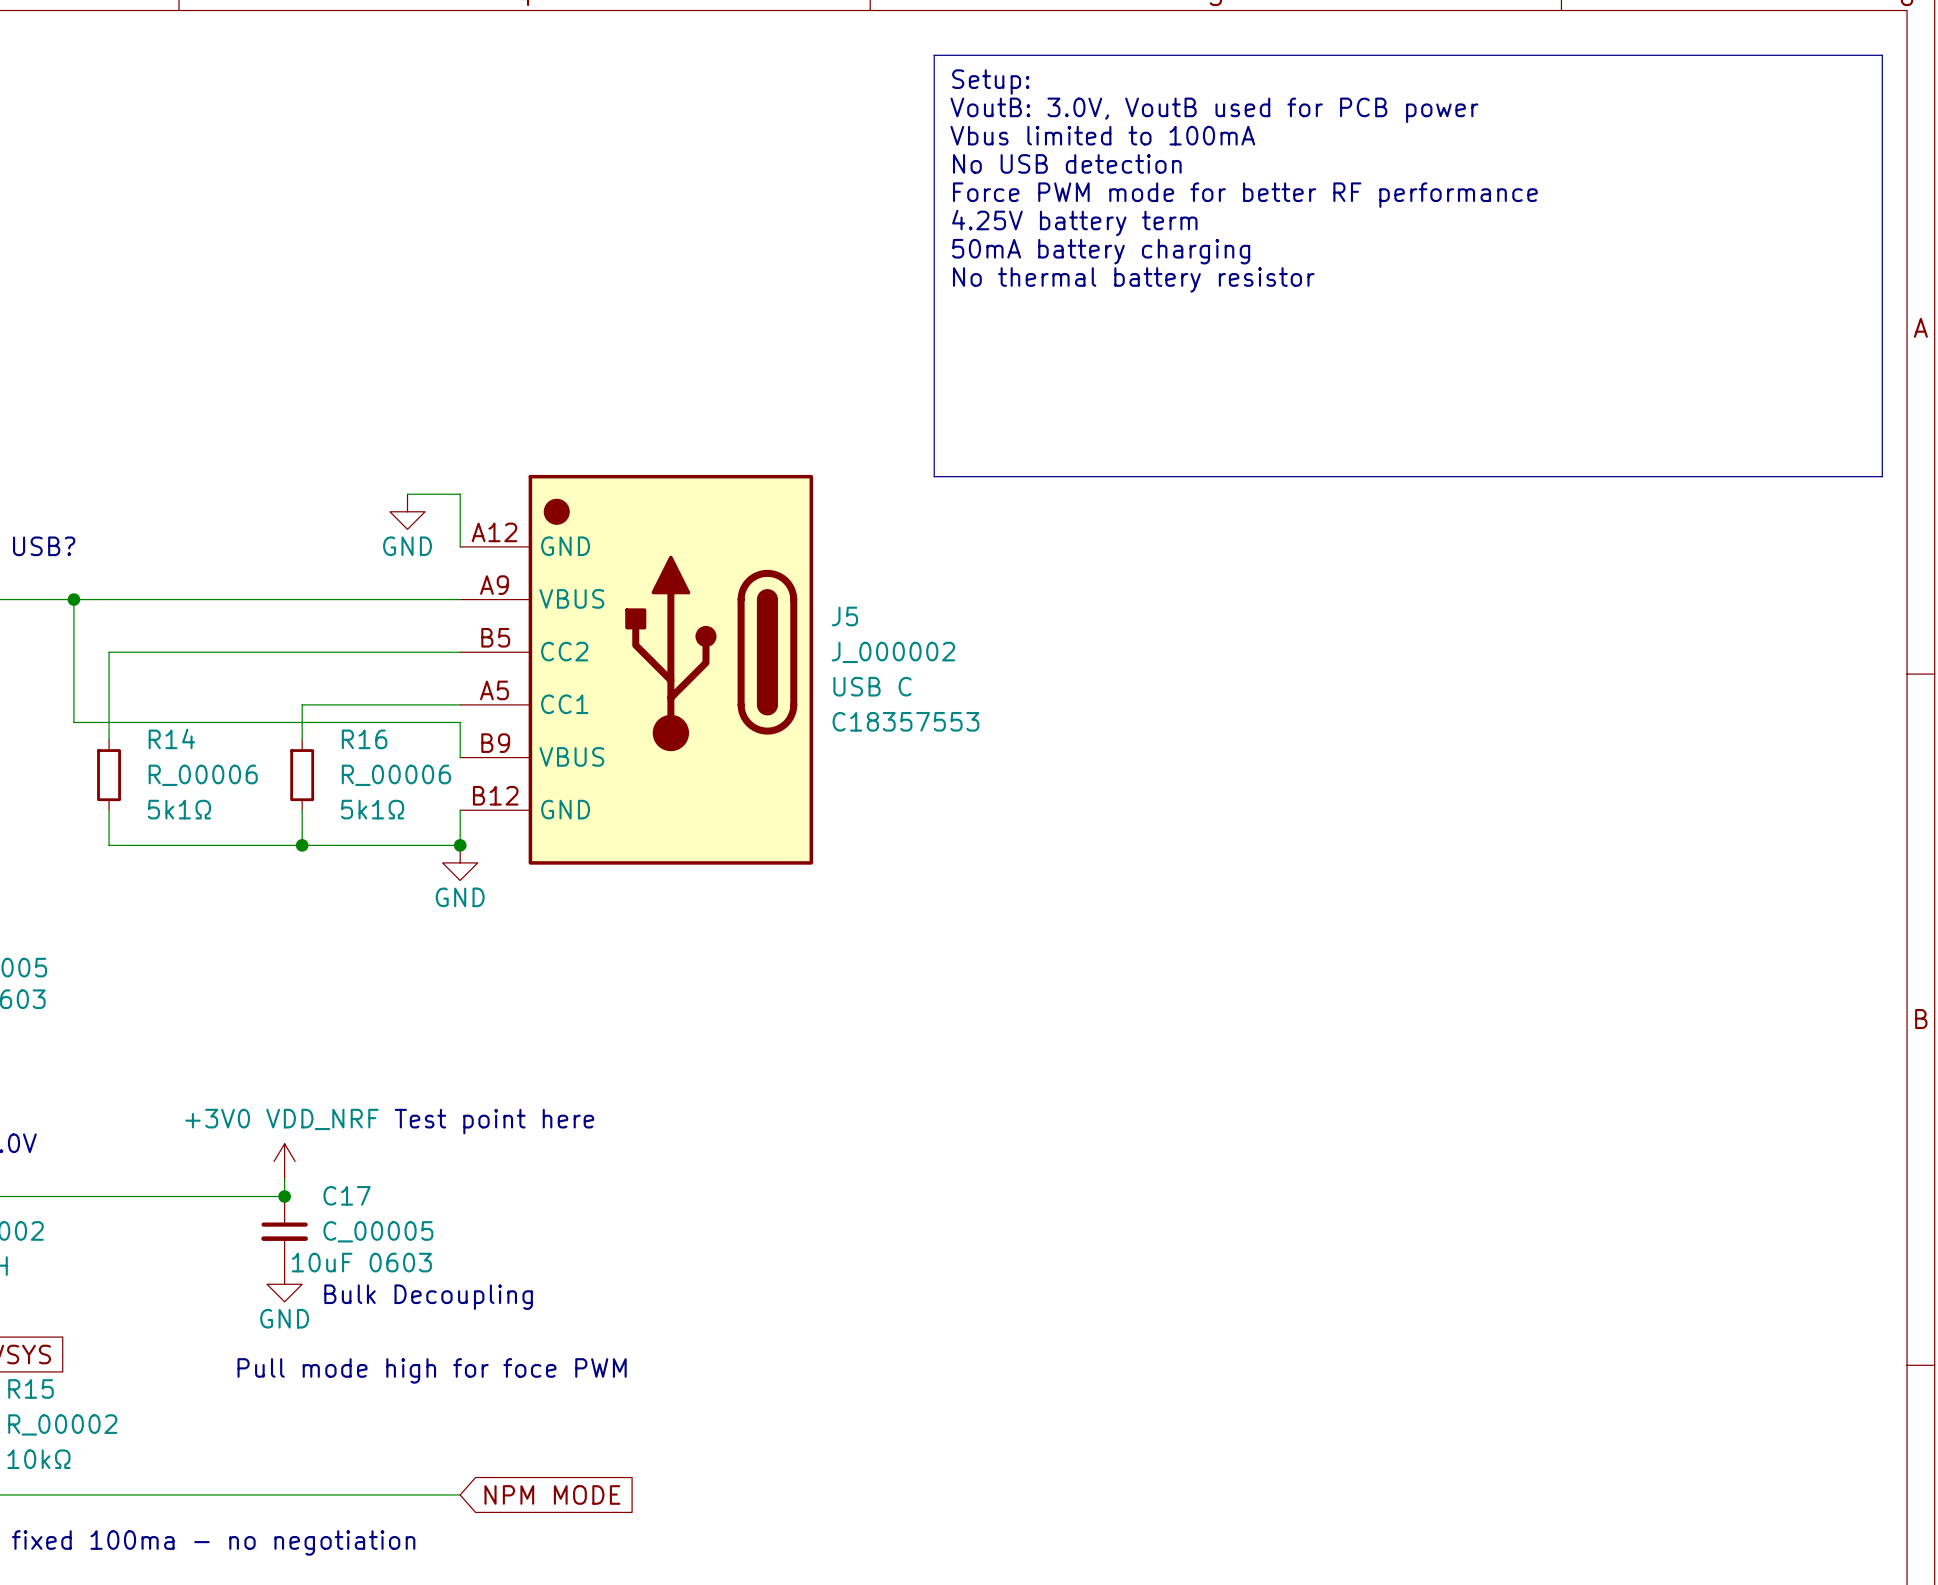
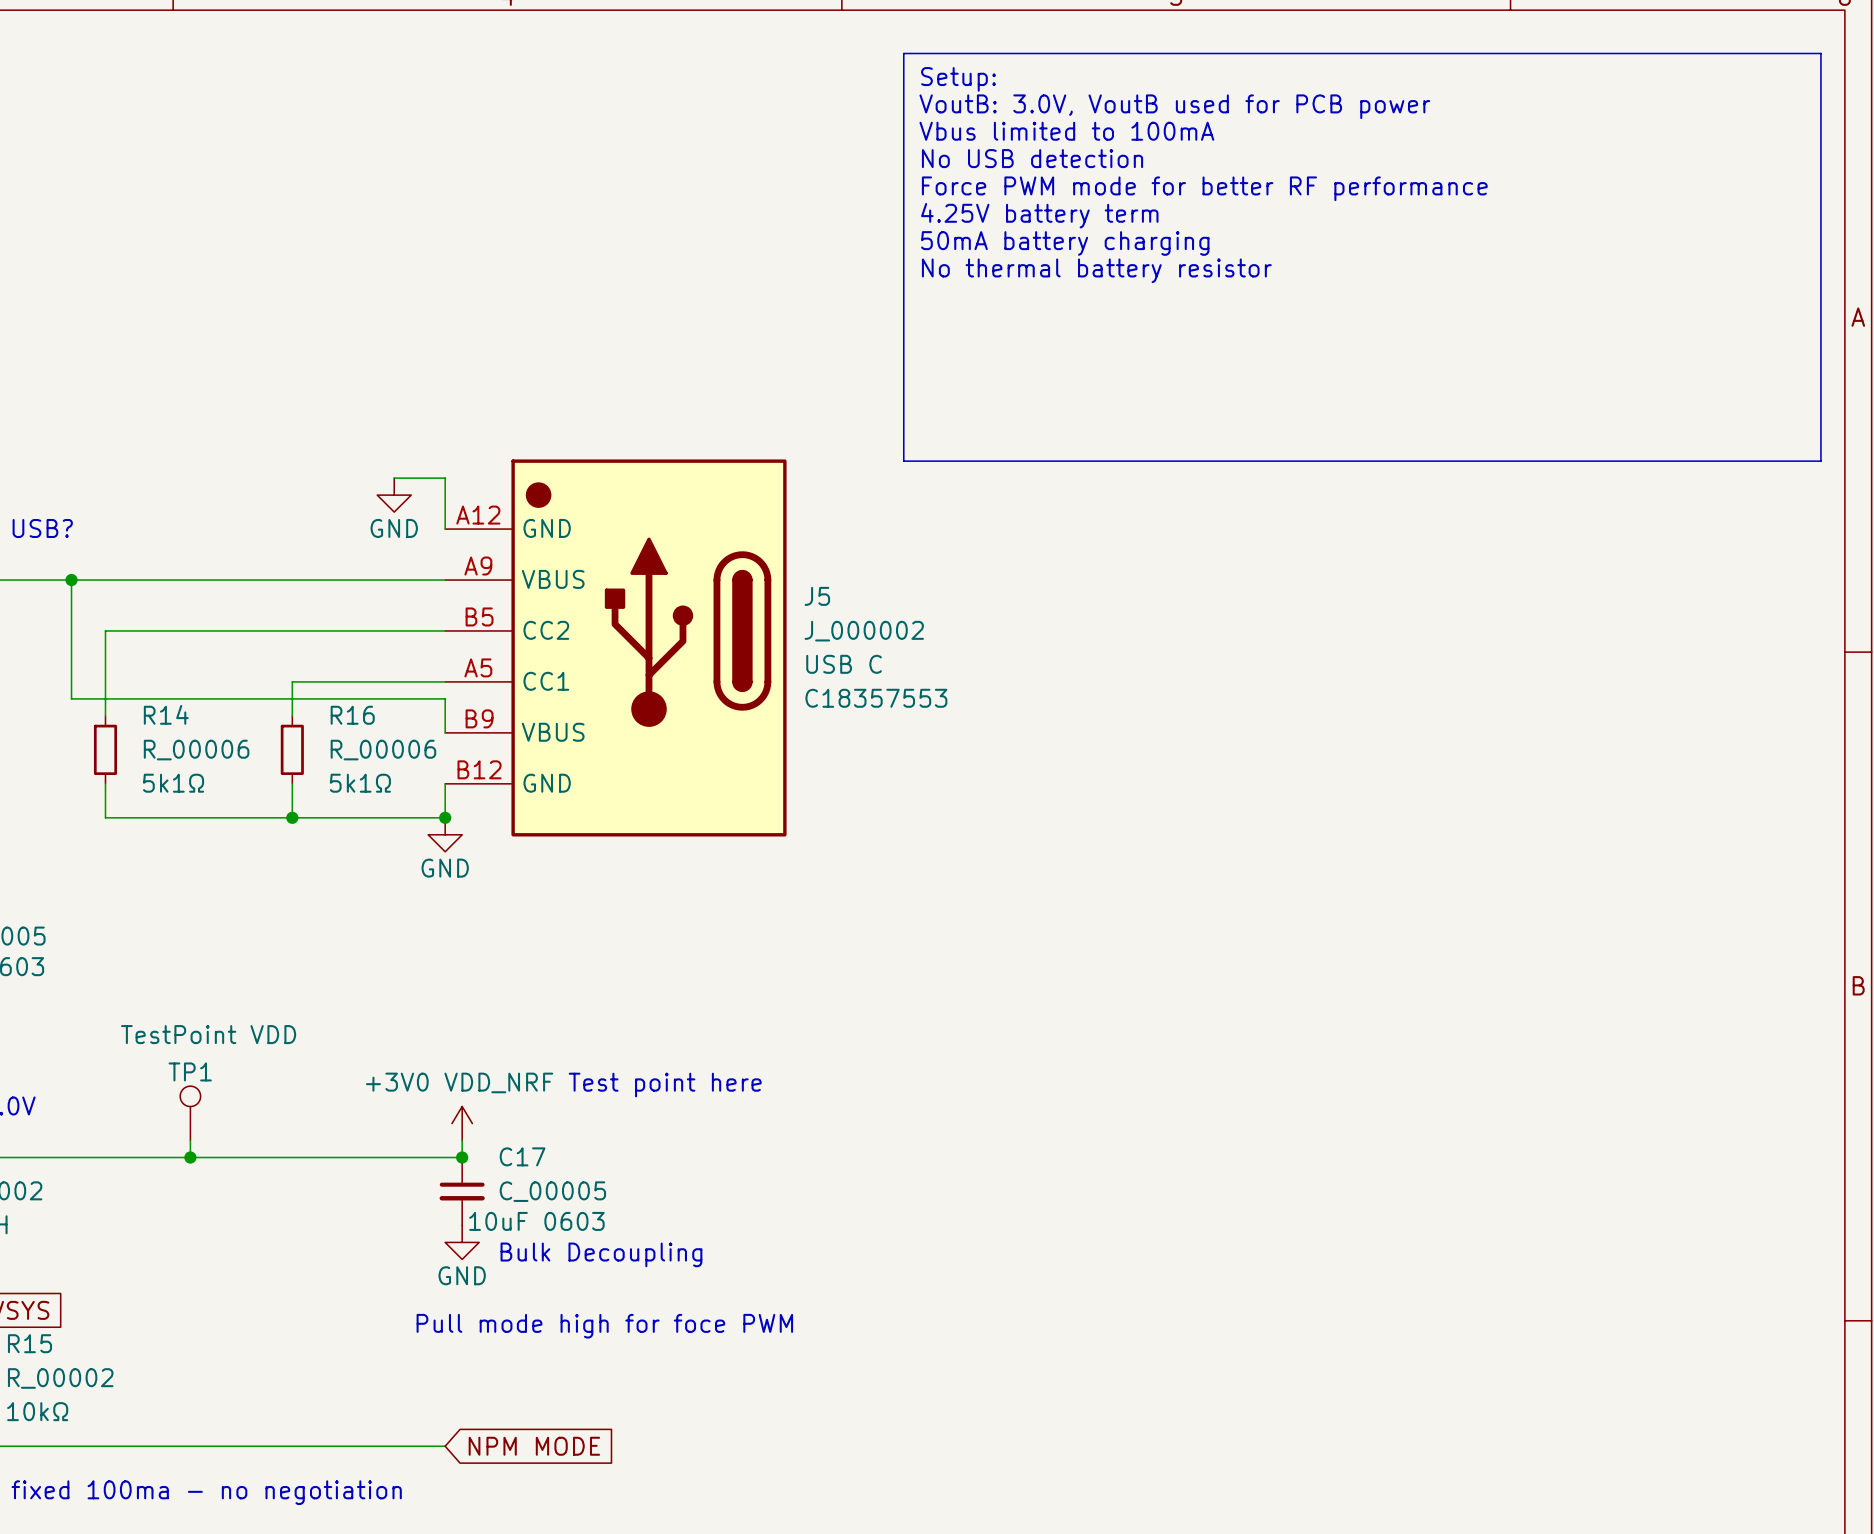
text position: Test point here (494, 1121) -> Test point here (665, 1085)
TP1: none -> TestPoint VDD (190, 1113)
power symbol position: +3V0 VDD_NRF (284, 1161) -> +3V0 VDD_NRF (462, 1123)
wire: none -> (190, 1140) (190, 1157)
wire: (284, 1178) (284, 1196) -> (462, 1140) (462, 1157) (275, 1157)
junction: none -> (190, 1157)
junction: (284, 1196) -> none
junction: none -> (462, 1157)
C17 position: (284, 1231) -> (462, 1191)
power symbol position: GND (284, 1284) -> GND (462, 1242)
text position: Bulk Decoupling (428, 1297) -> Bulk Decoupling (601, 1254)
text position: Pull mode high for foce PWM (432, 1370) -> Pull mode high for foce PWM (604, 1326)

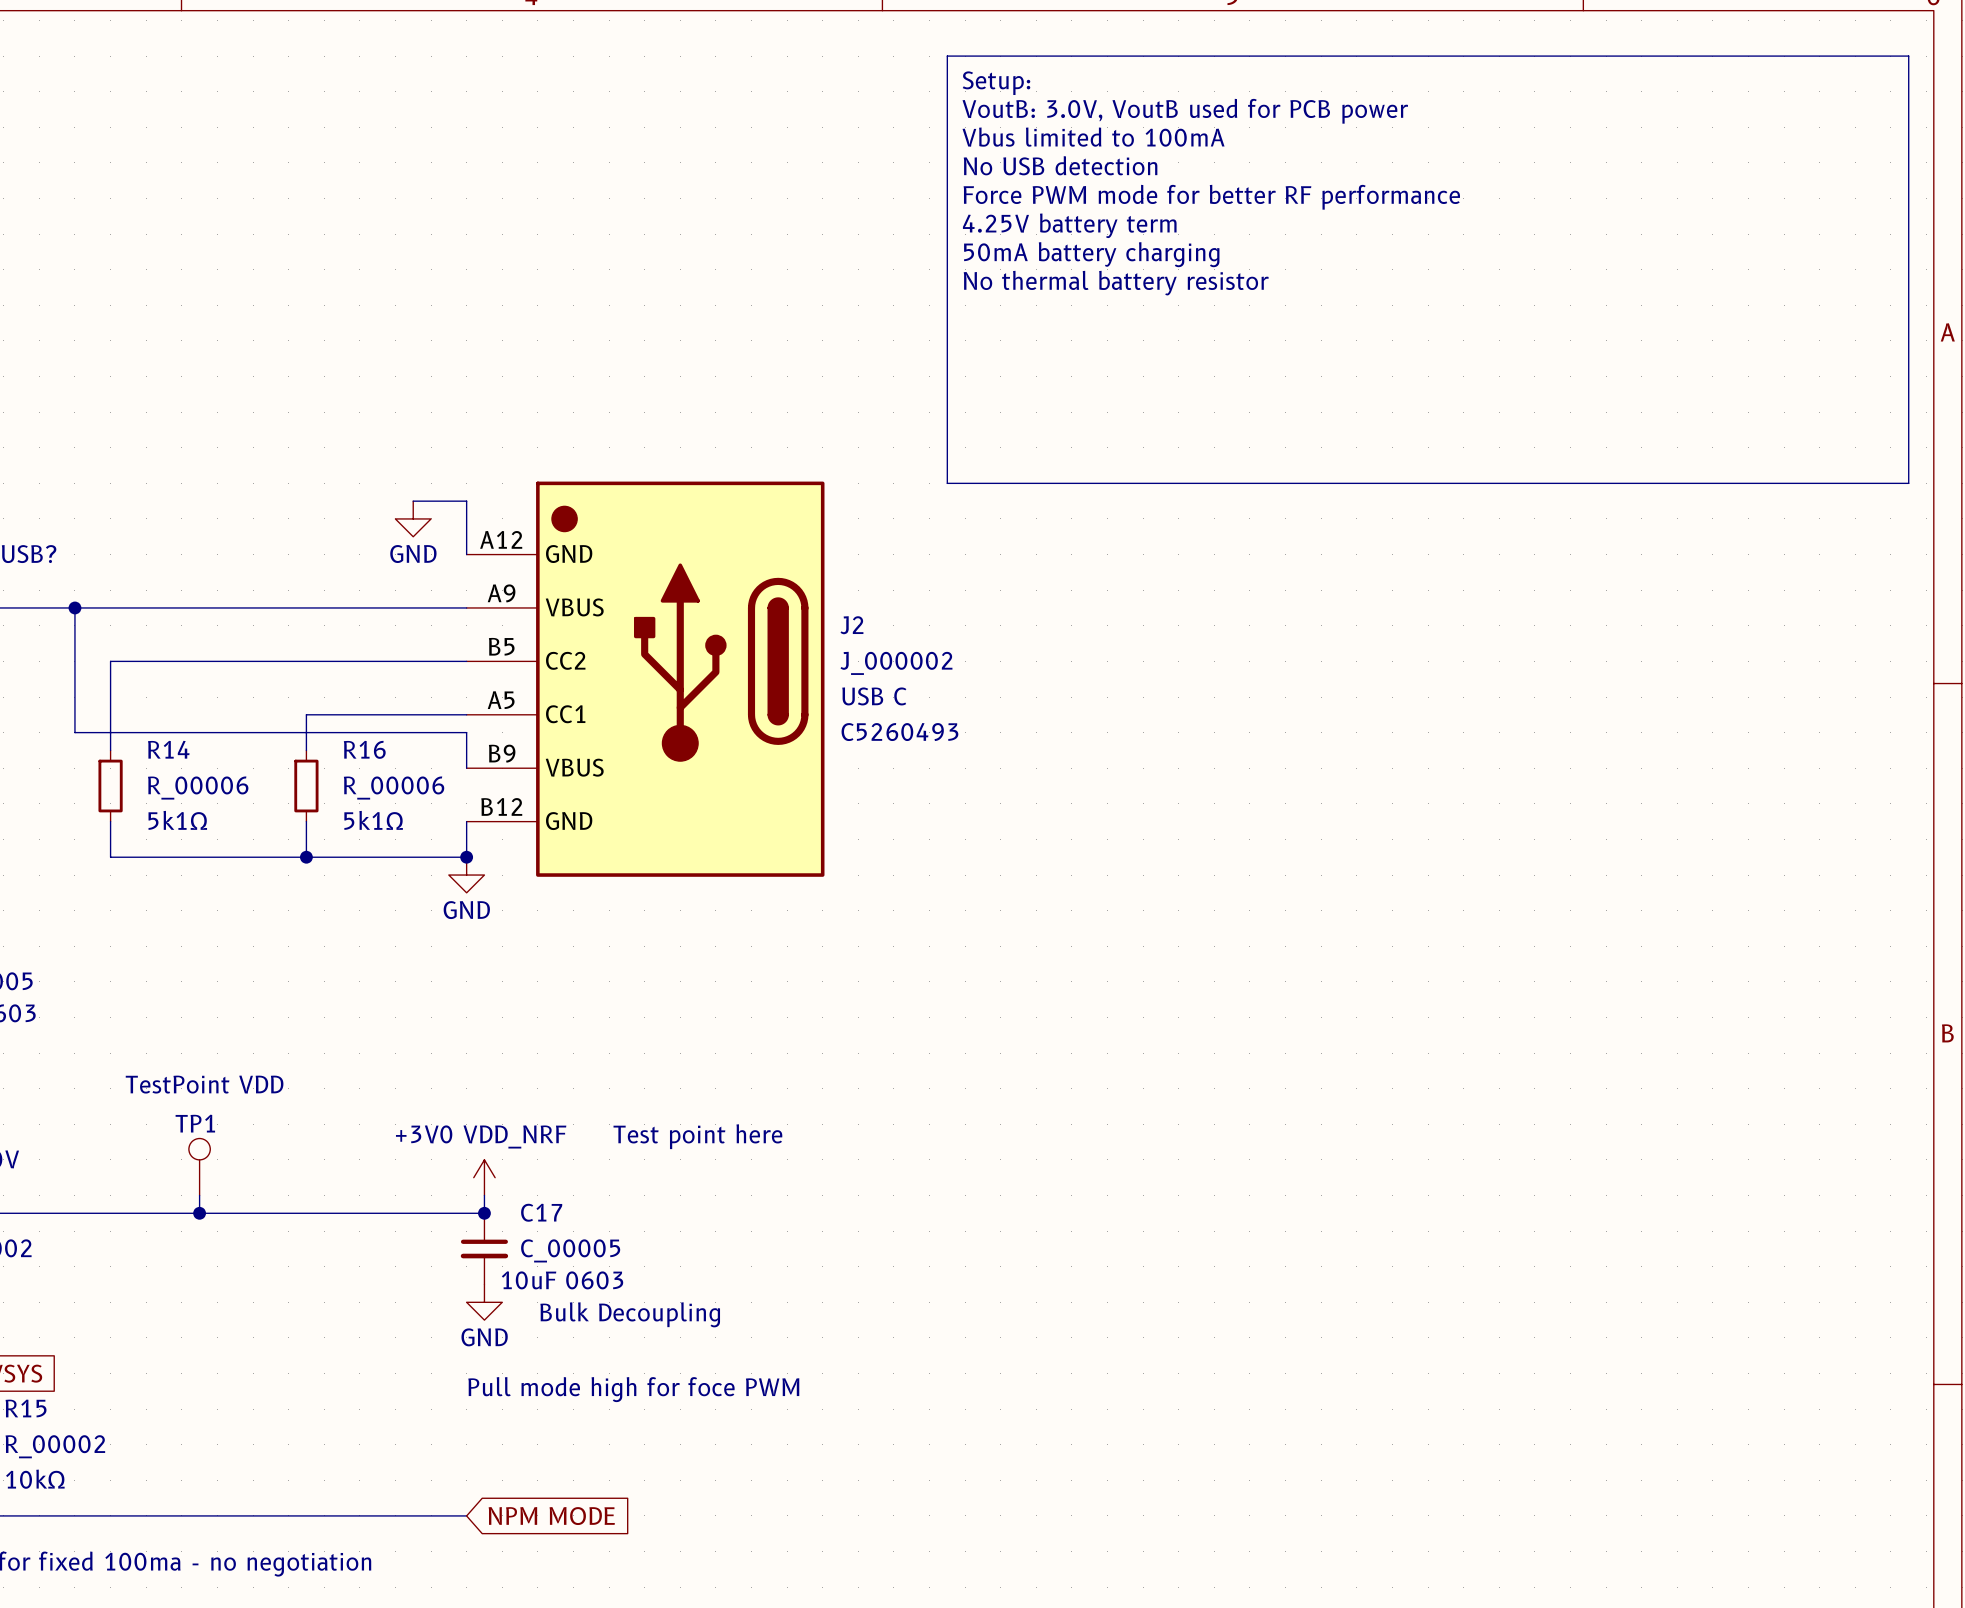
J5 name: J5 (817, 596) -> J2 (851, 625)
J5 text: C18357553 (876, 698) -> C5260493 (899, 732)

